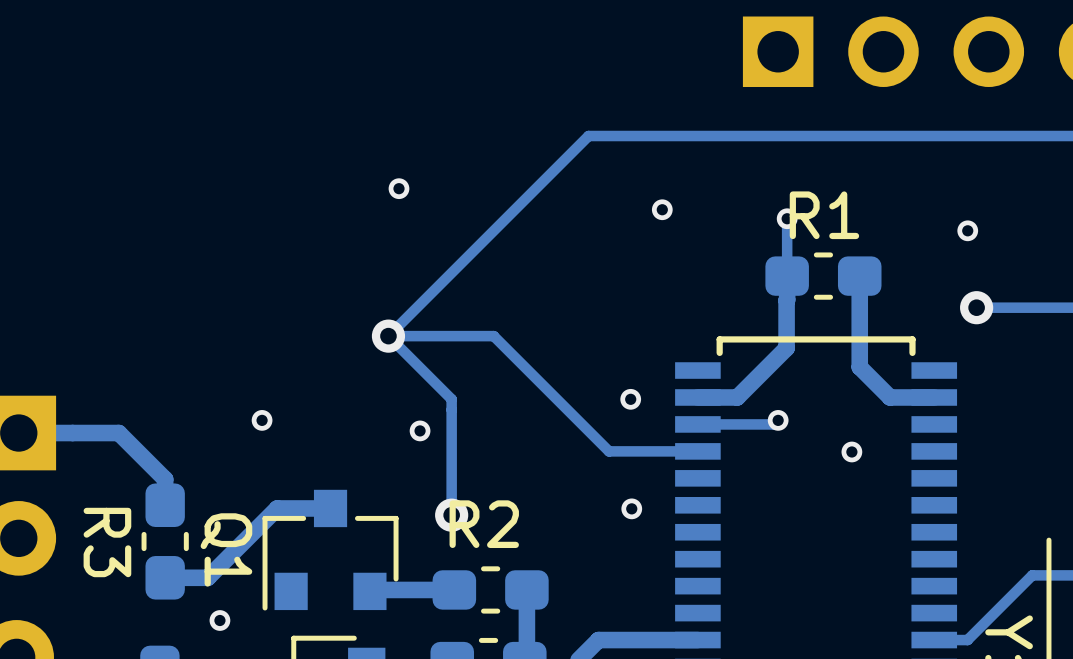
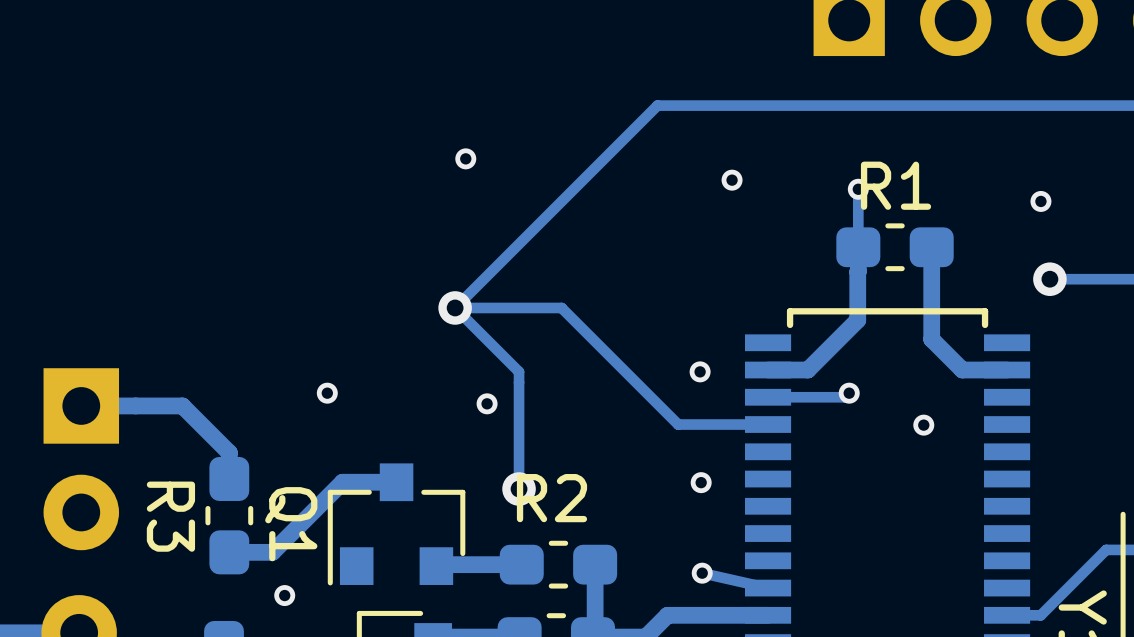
track: none -> (702, 573) (768, 588)
via: none -> (702, 573)

